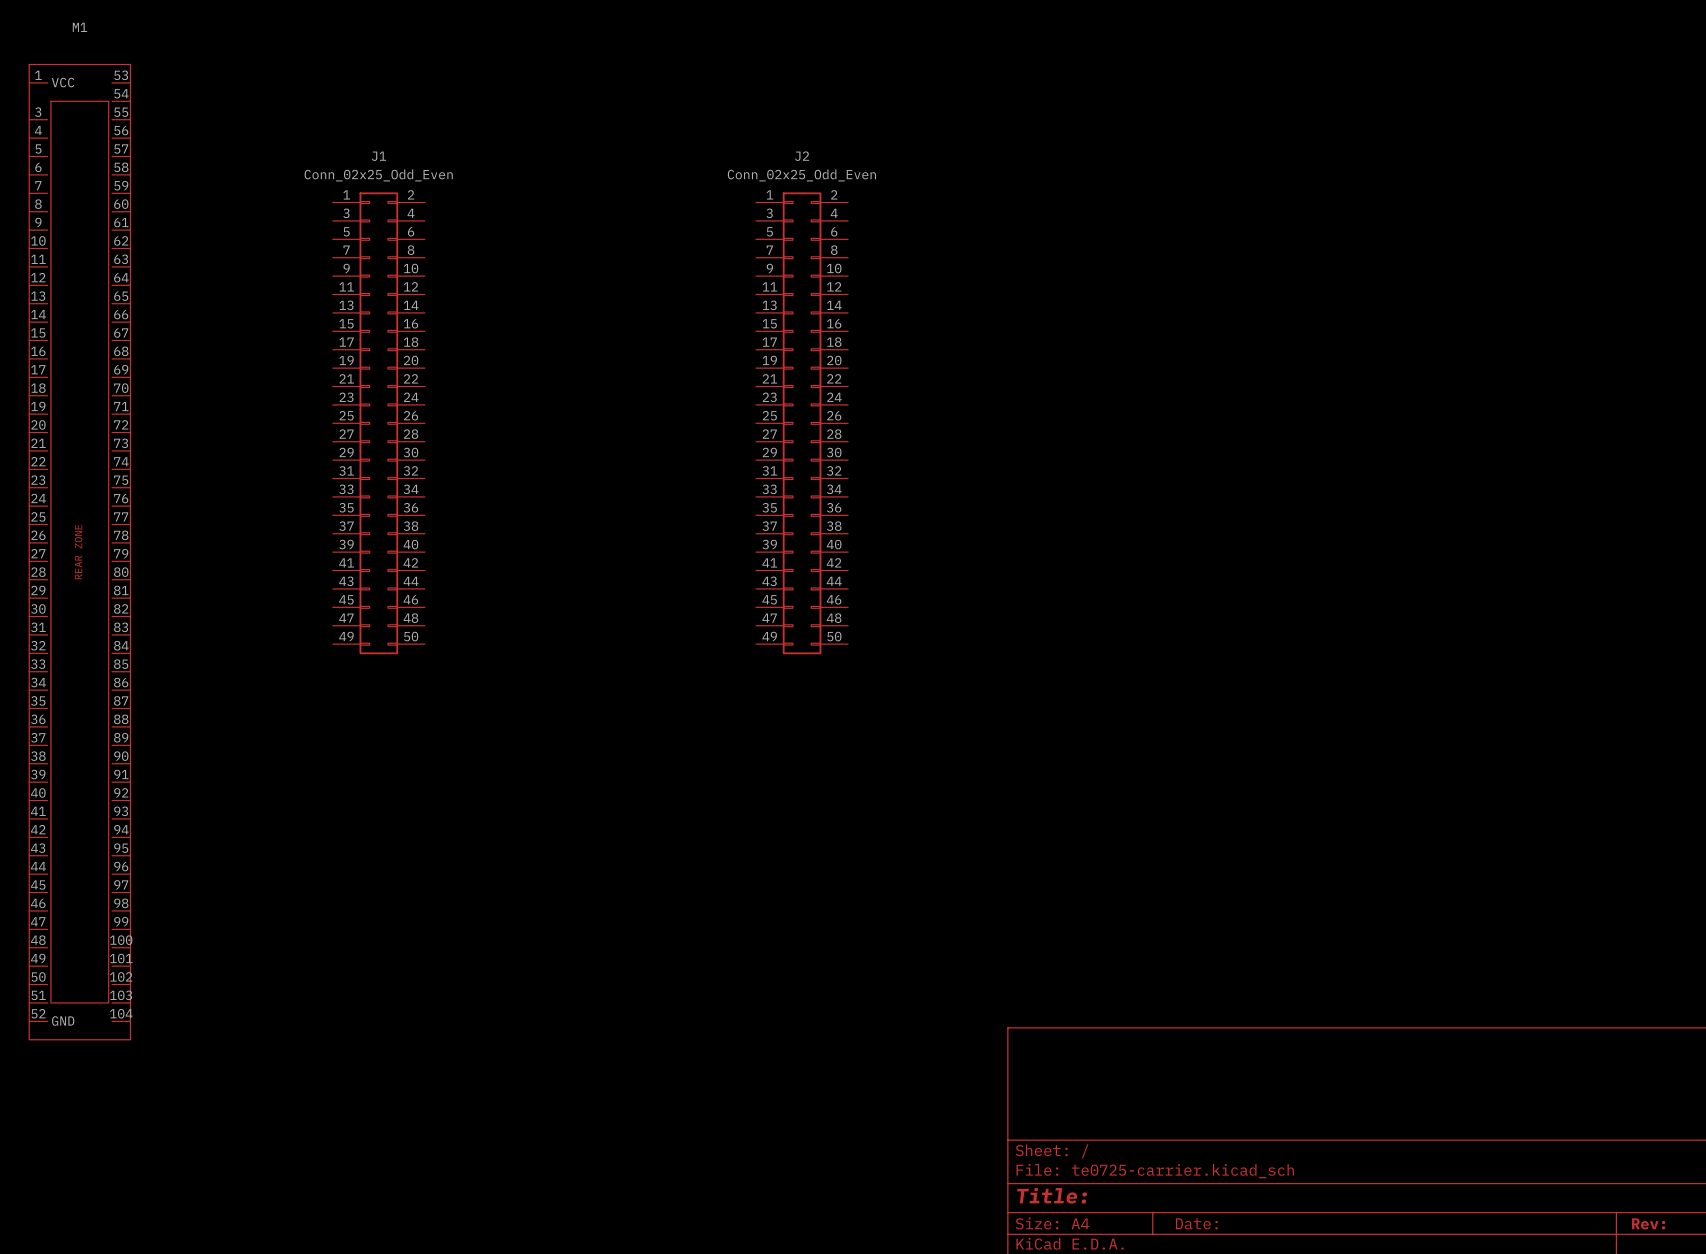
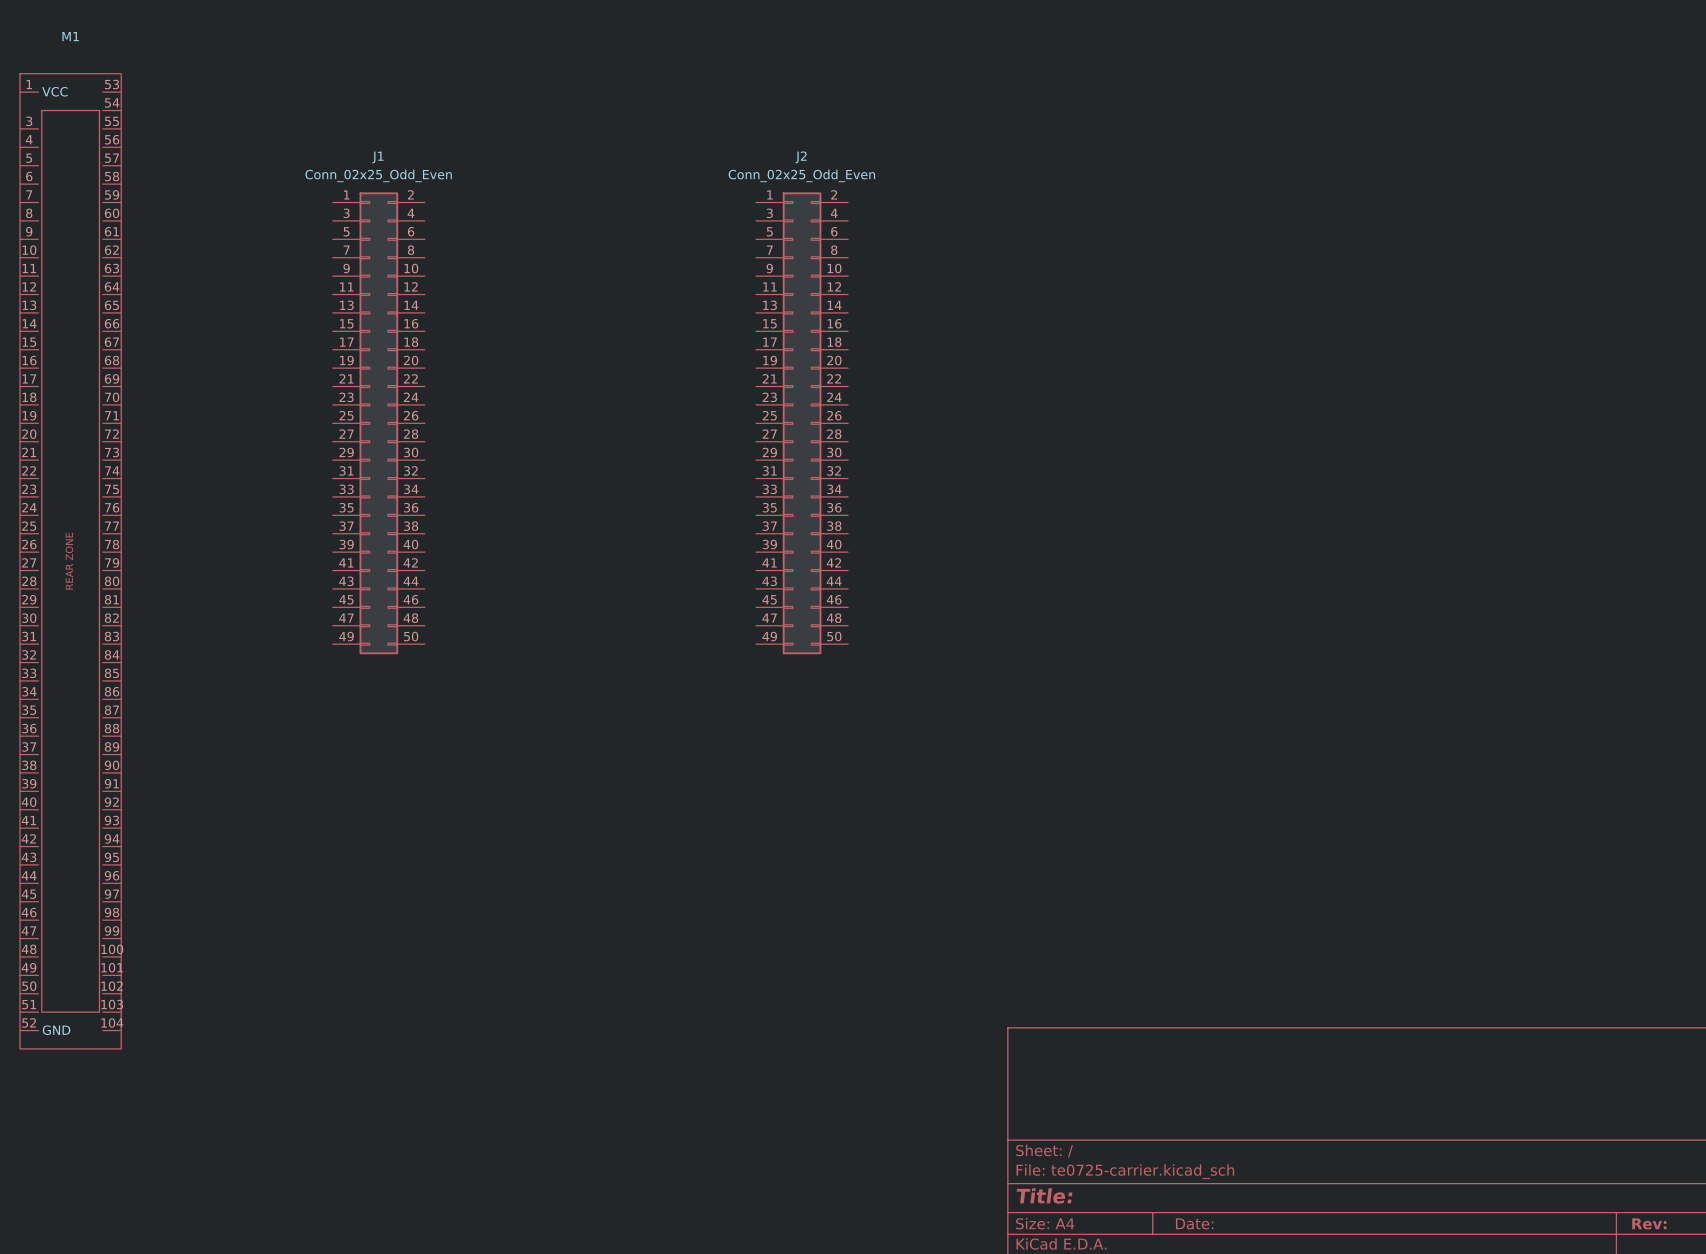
M1 position: (79, 552) -> (70, 561)

